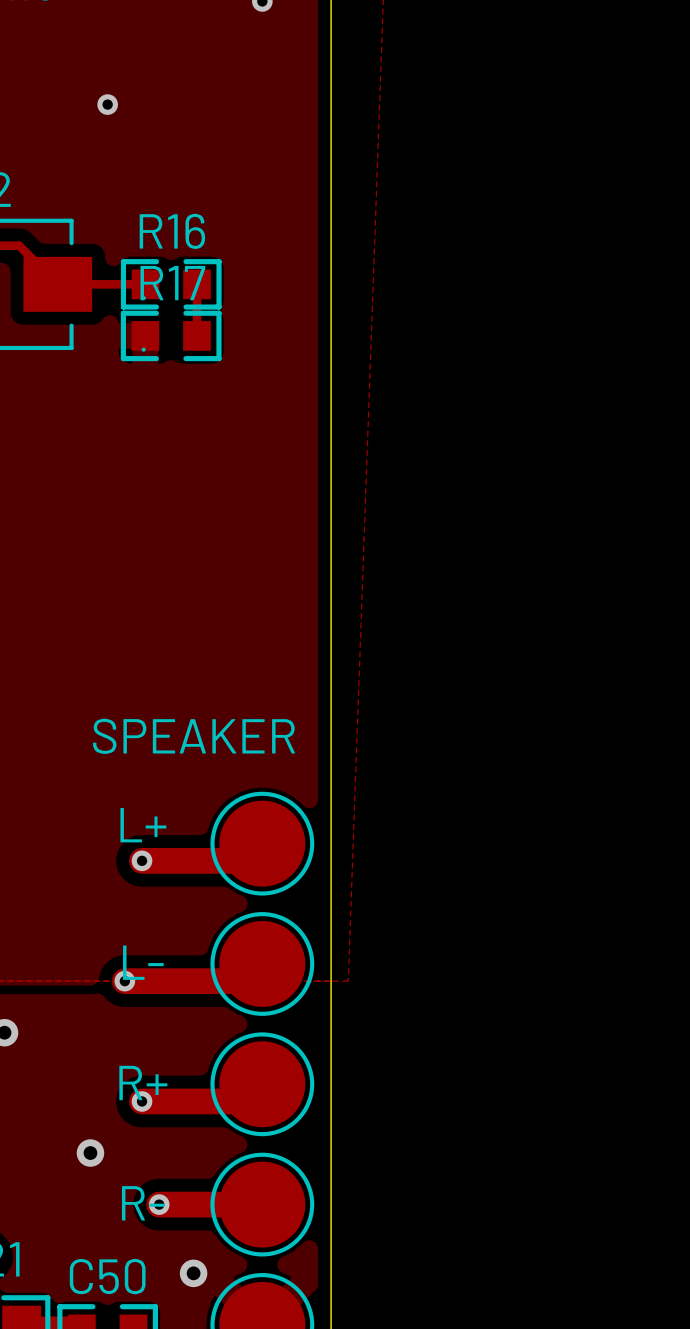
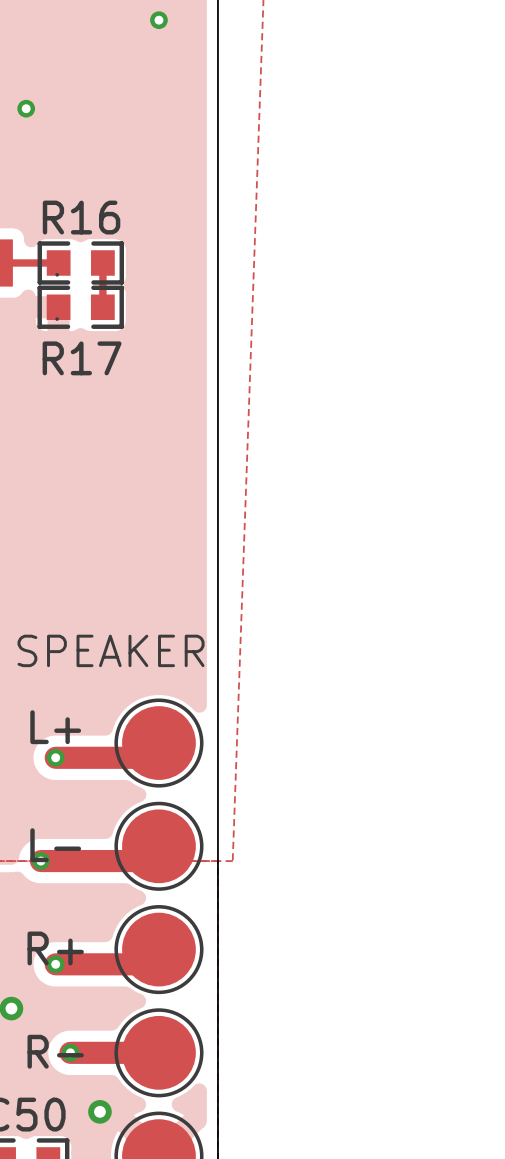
R17 name position: R17 (172, 283) -> R17 (82, 358)

